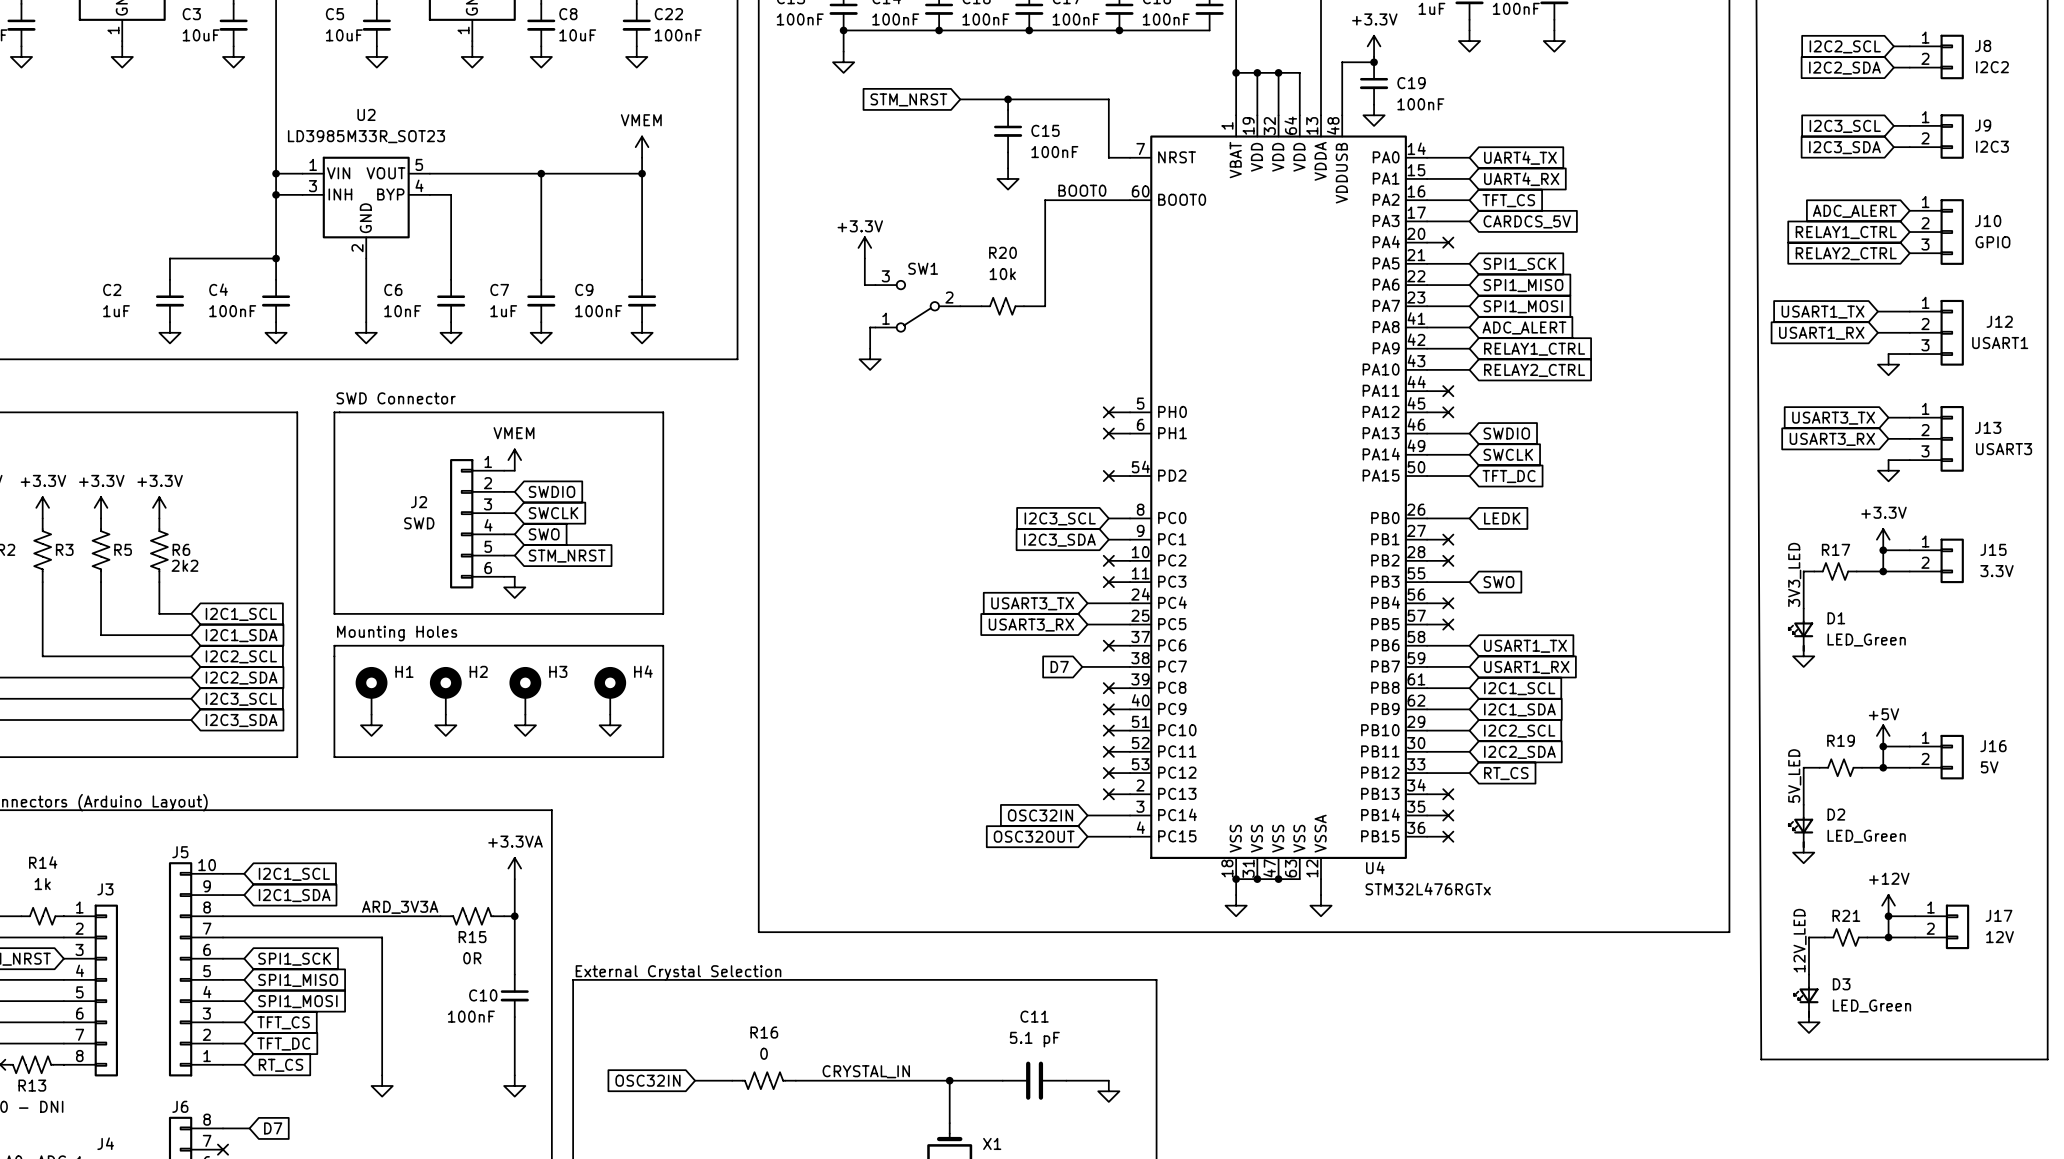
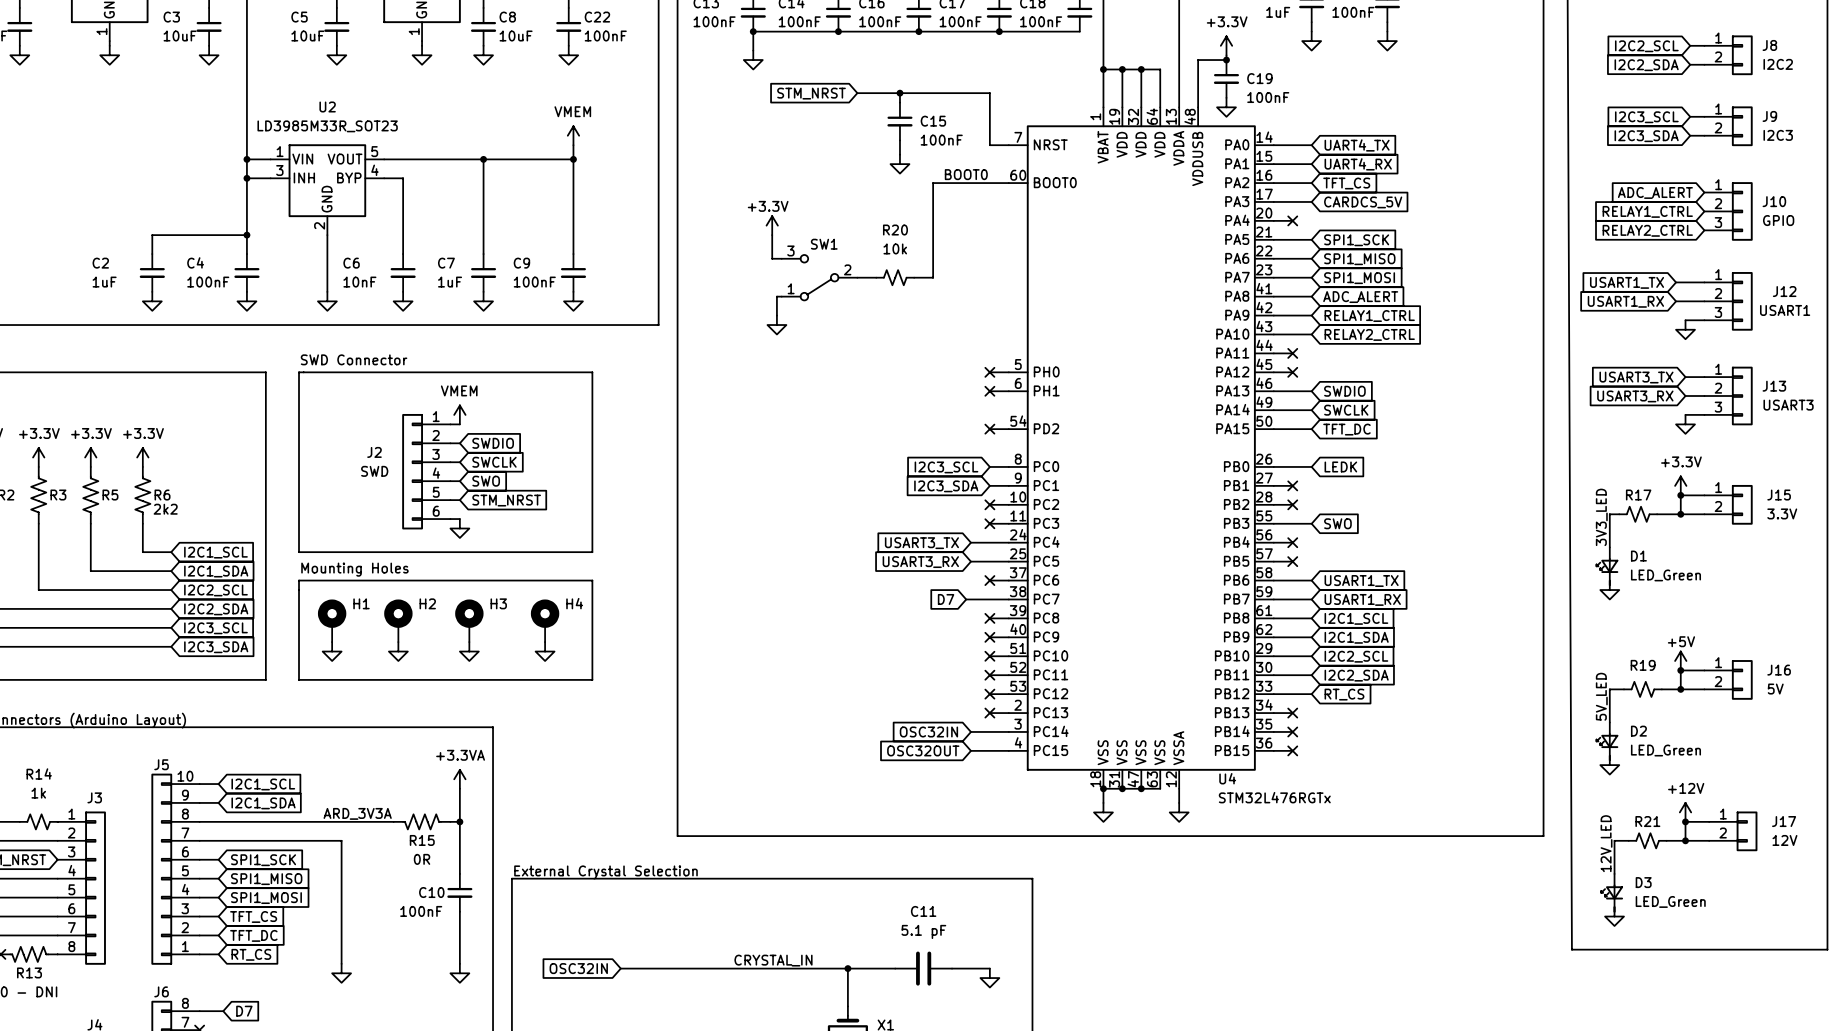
R16: 0 (764, 1080) -> none

